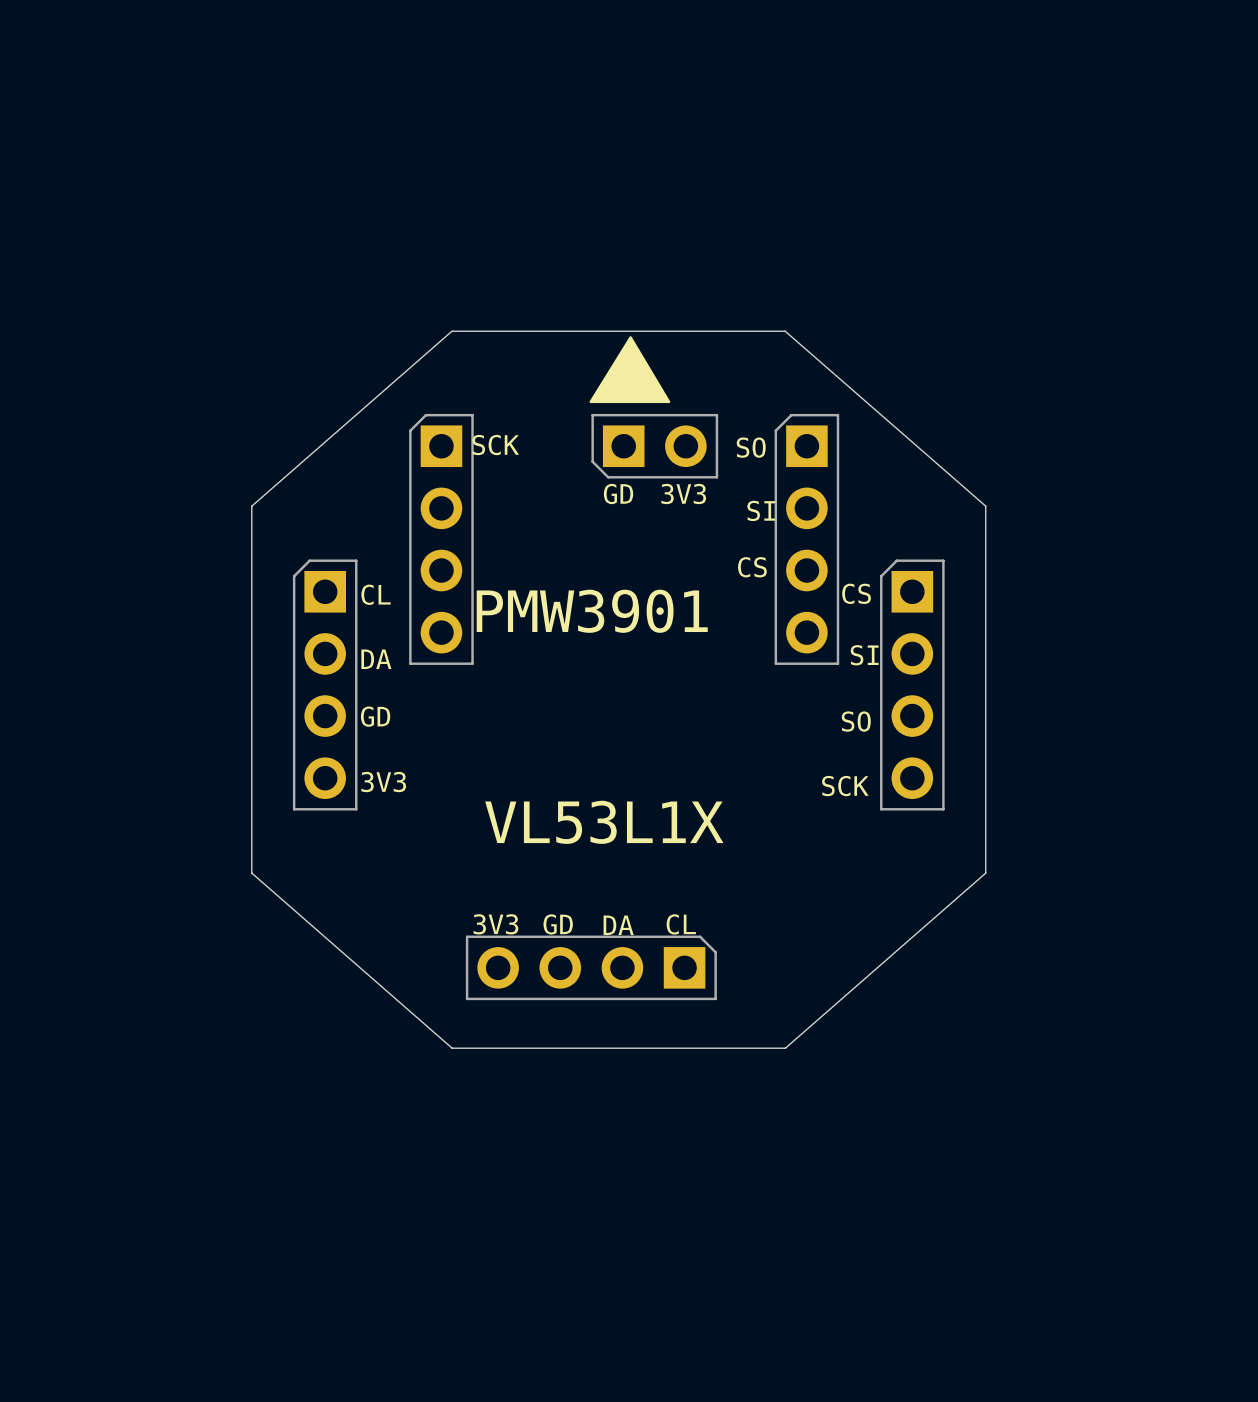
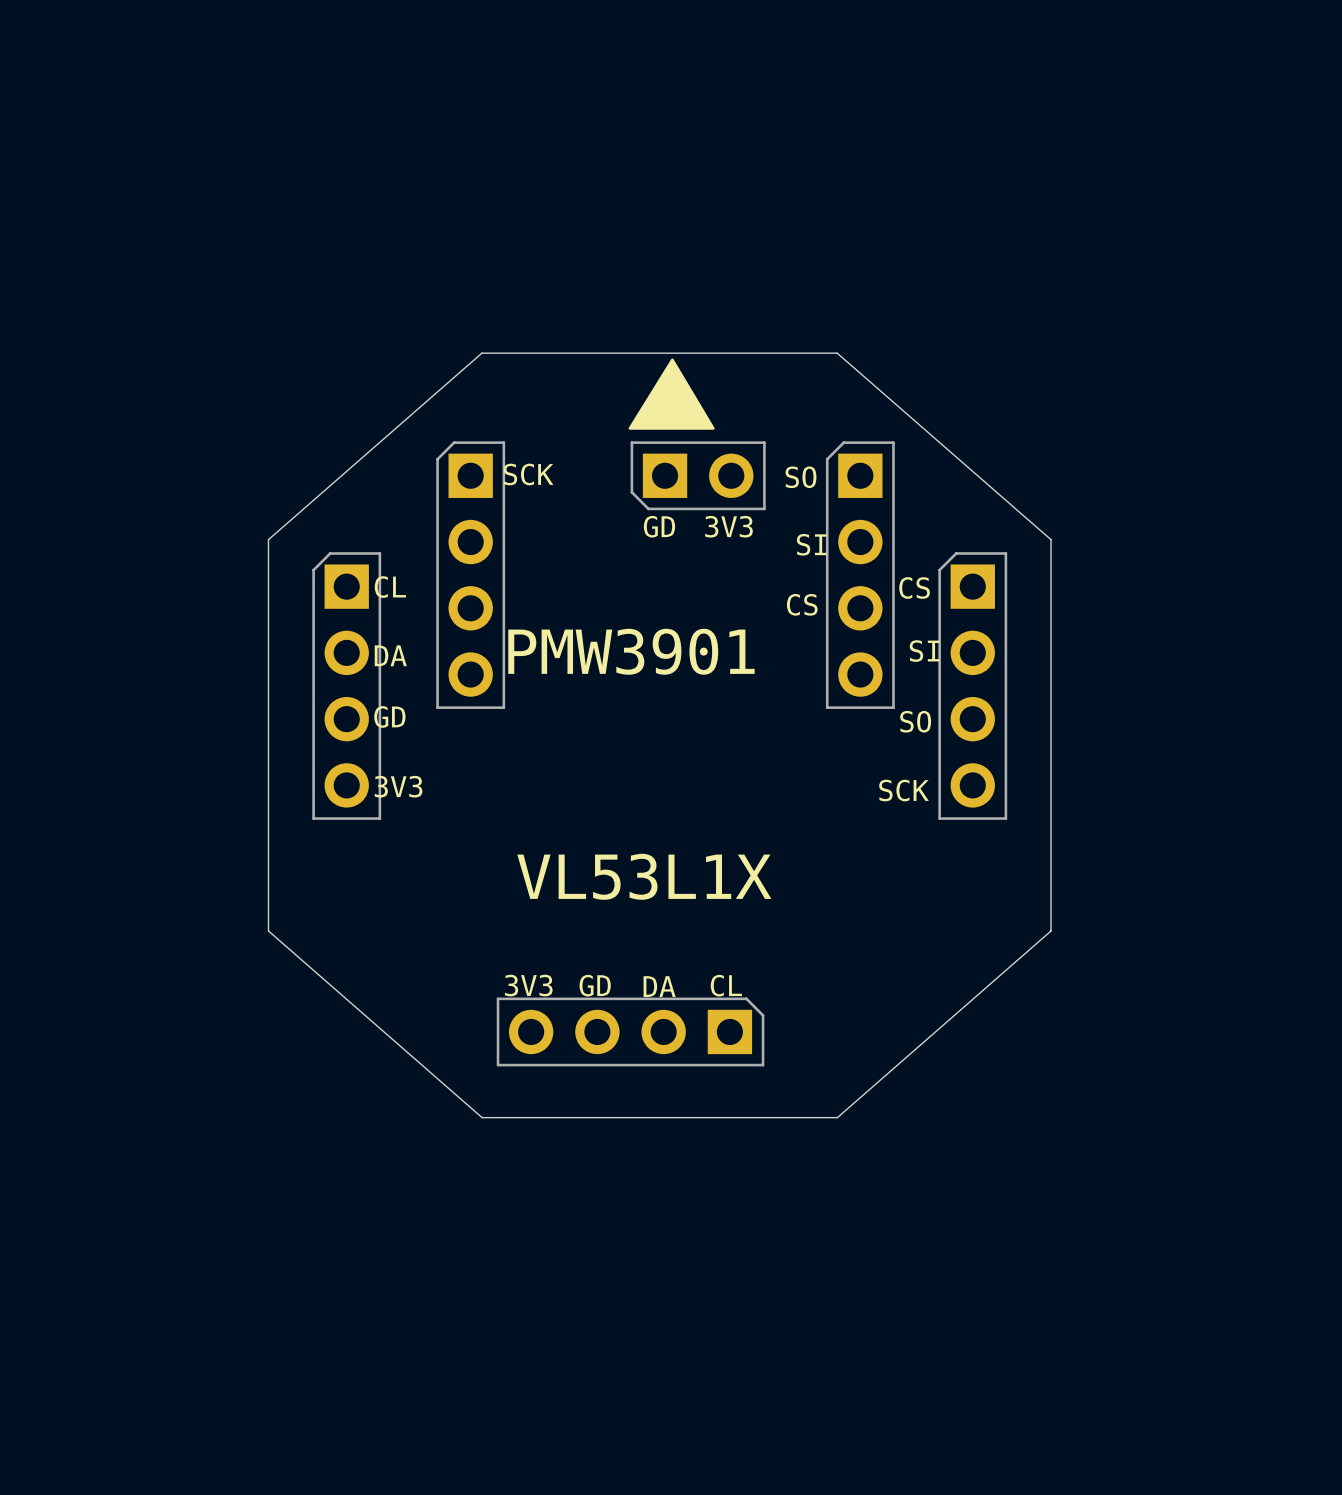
text: none -> CS (914, 587)
text: CS (856, 593) -> SI (924, 651)
text position: CL (376, 594) -> CL (390, 587)
text: none -> DA (390, 655)
text: SI (864, 655) -> none
text: DA (376, 659) -> GD (389, 716)
part position: (325, 684) -> (346, 686)
part position: (912, 684) -> (972, 686)
text: GD (375, 716) -> none
text position: SO (856, 721) -> SO (915, 721)
text position: 3V3 (383, 782) -> 3V3 (398, 786)
text position: SCK (845, 786) -> SCK (904, 790)

